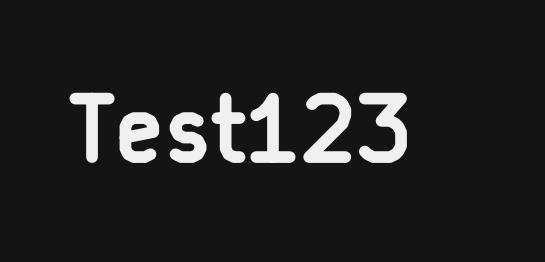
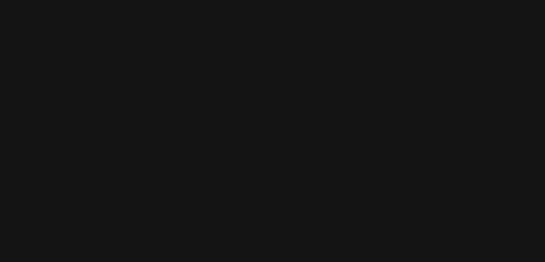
text: Test123 (238, 127) -> none

